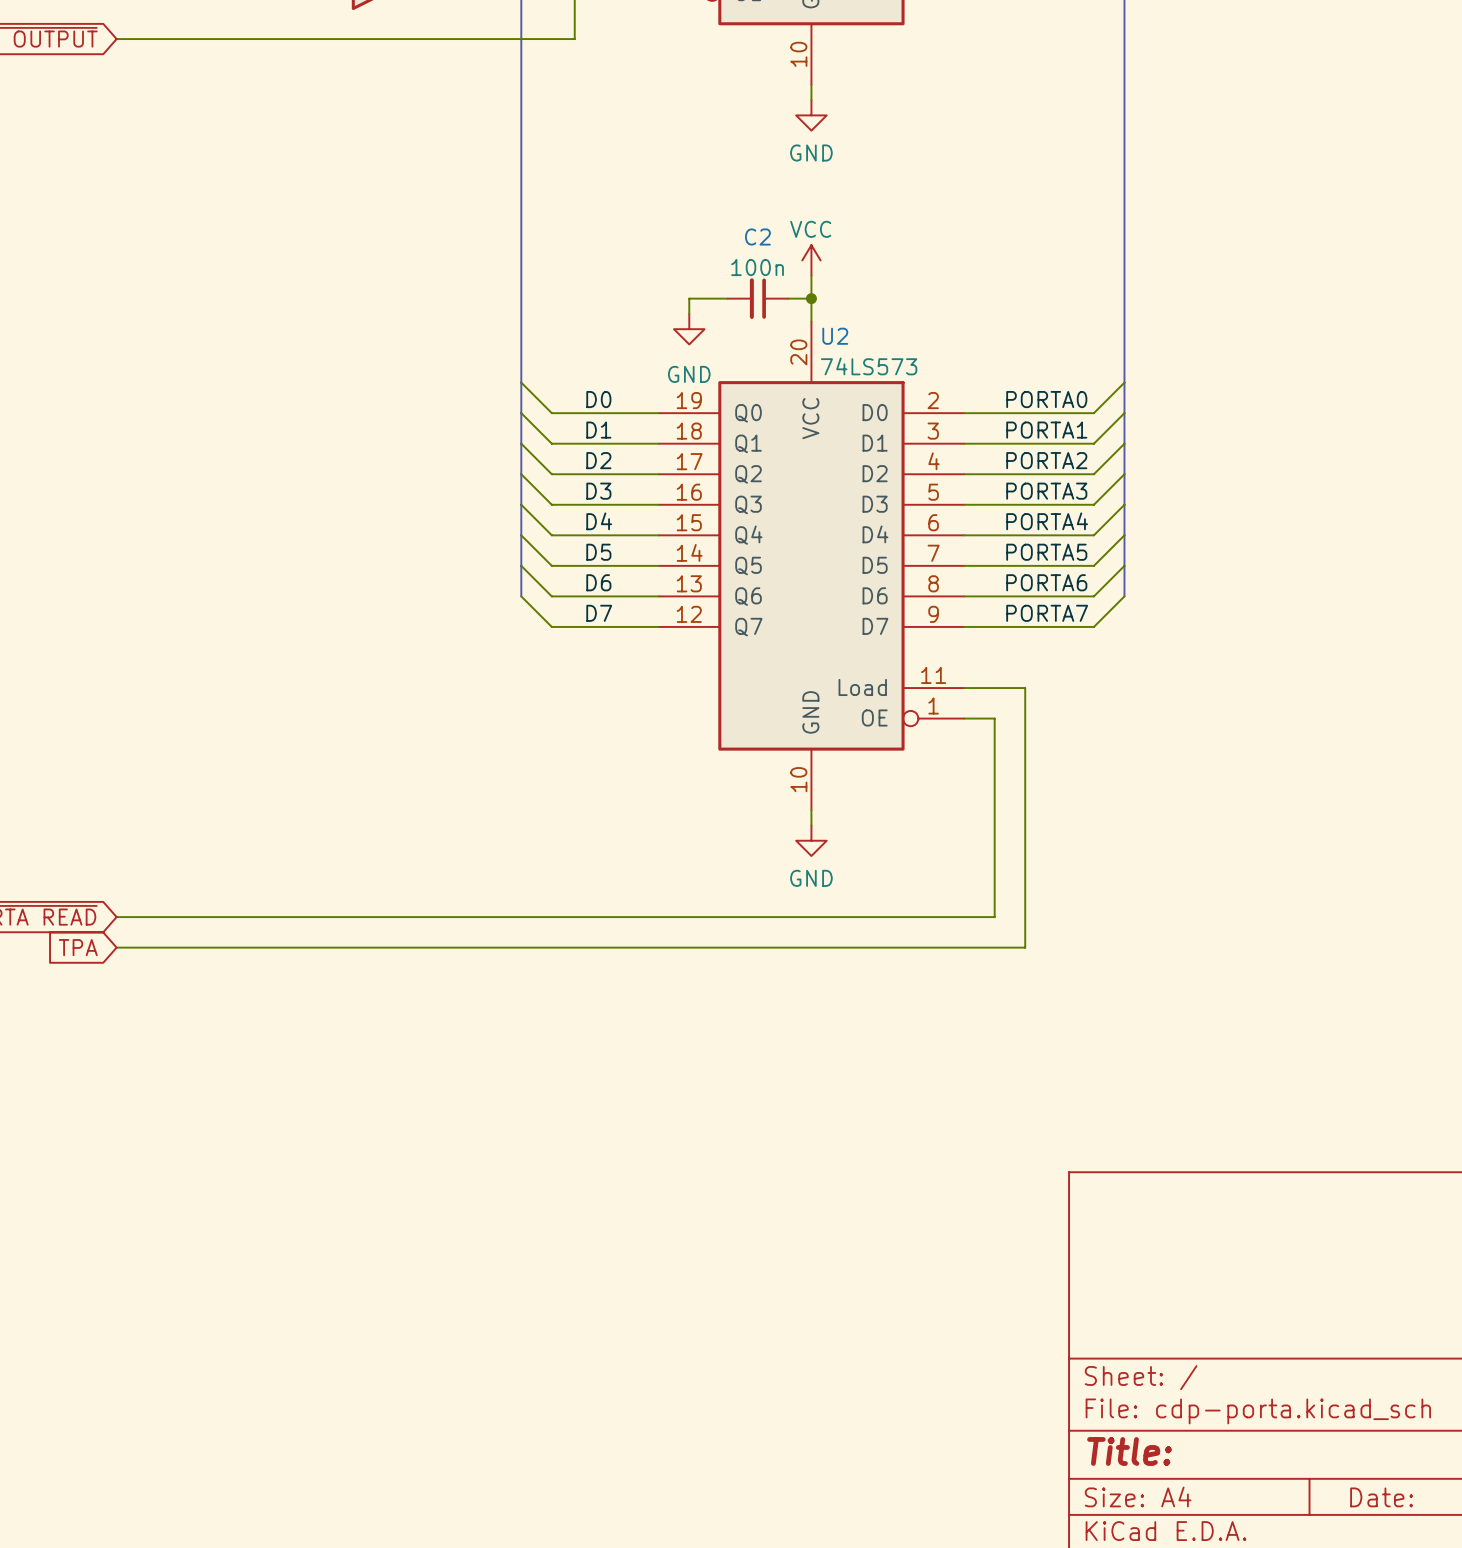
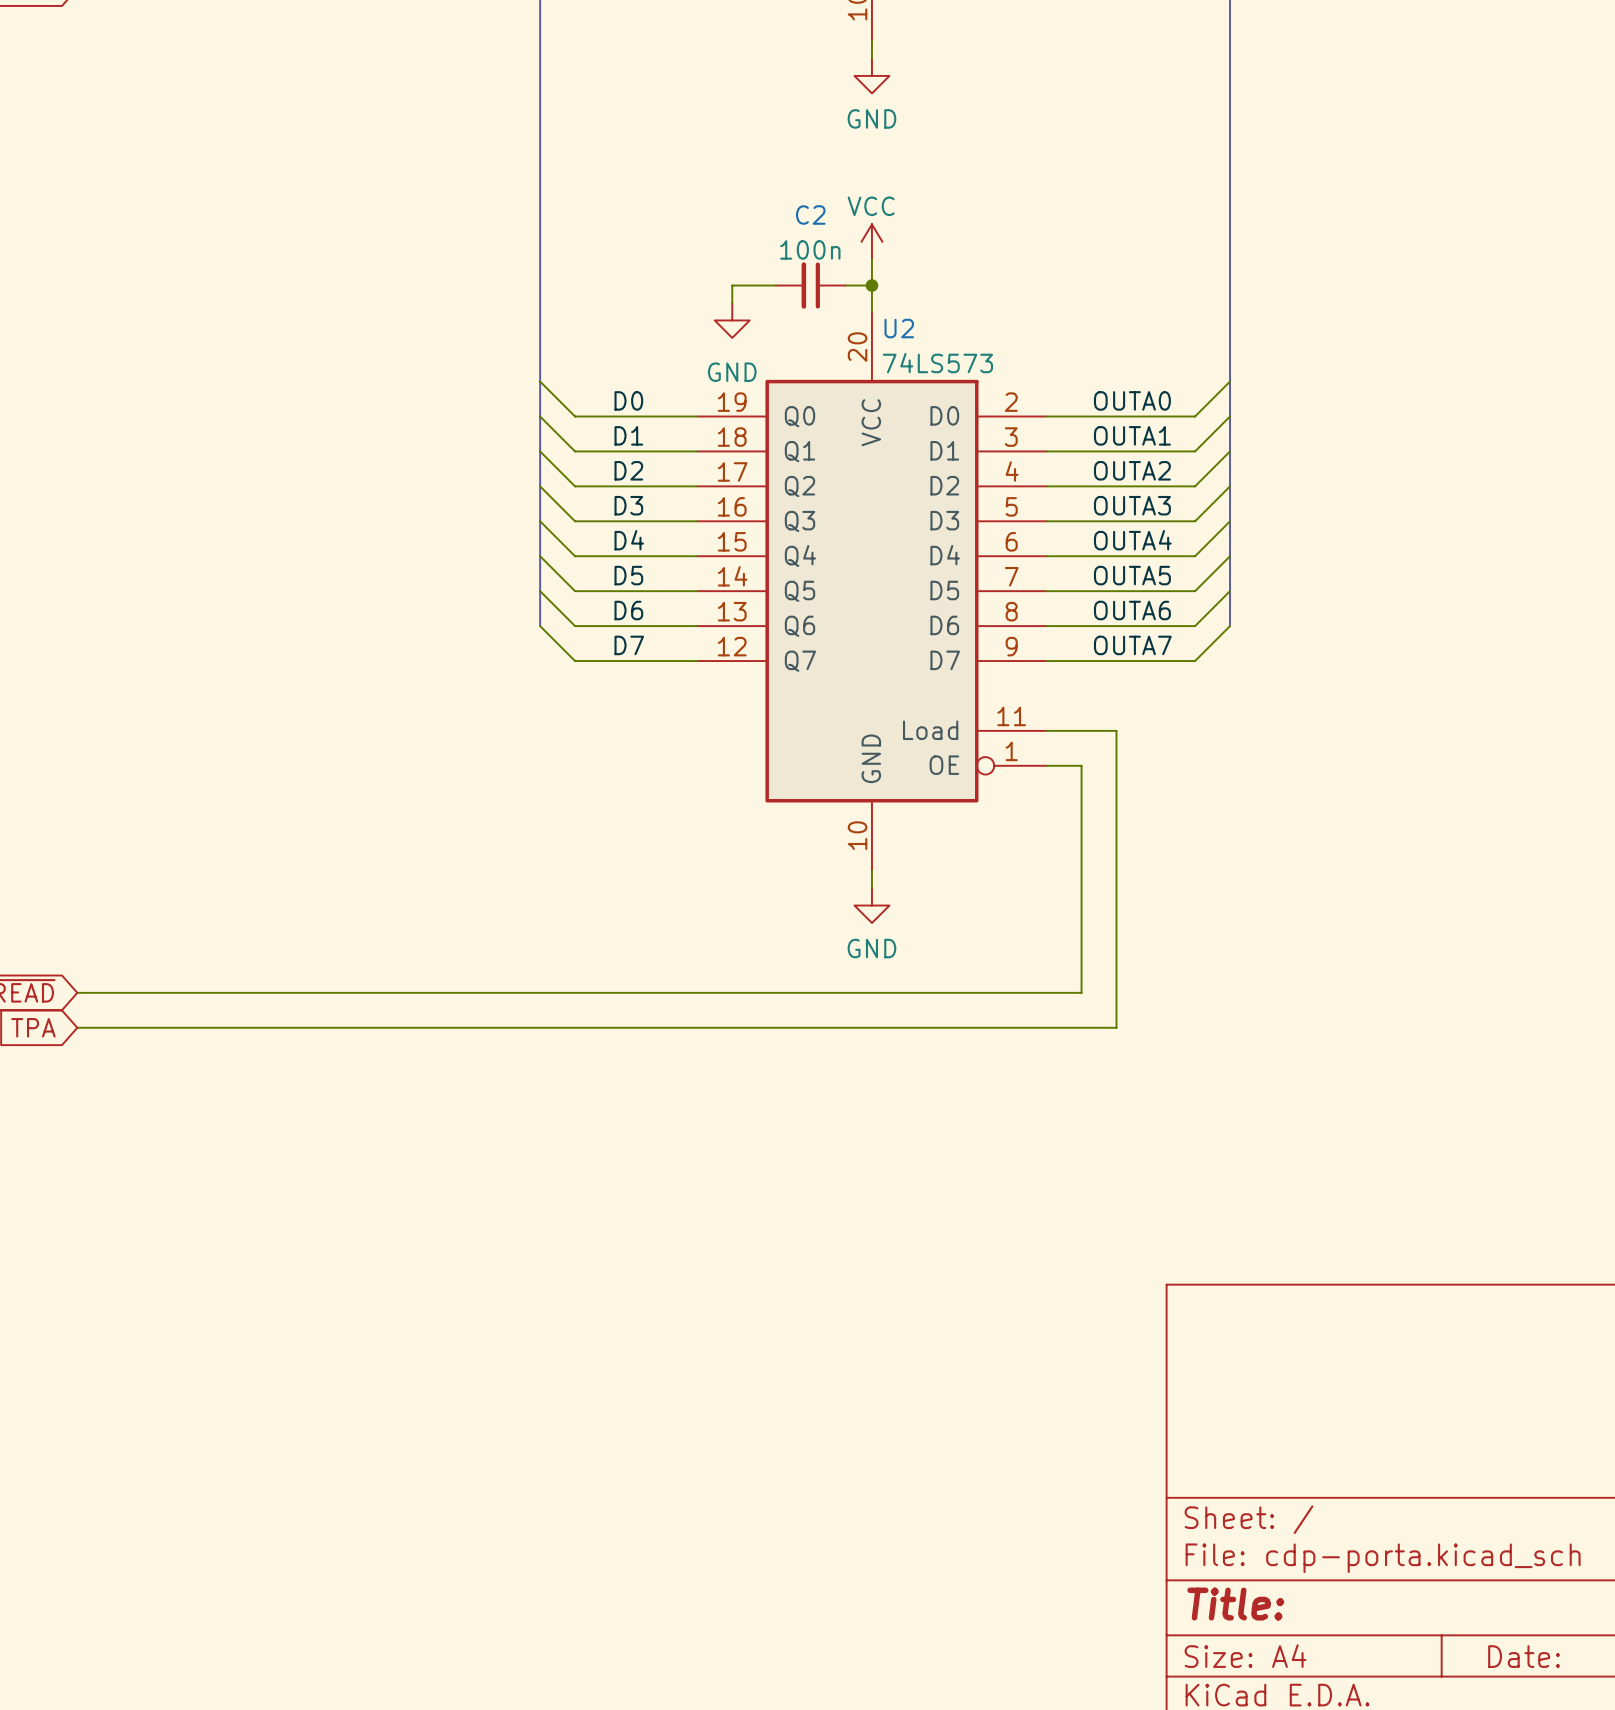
label: PORTA0 (1046, 399) -> OUTA0 (1132, 400)
label: PORTA1 (1046, 430) -> OUTA1 (1132, 435)
label: PORTA2 (1046, 460) -> OUTA2 (1132, 470)
label: PORTA3 (1046, 491) -> OUTA3 (1132, 505)
label: PORTA4 (1047, 521) -> OUTA4 (1132, 540)
label: PORTA5 (1046, 552) -> OUTA5 (1132, 575)
label: PORTA6 (1046, 582) -> OUTA6 (1132, 610)
label: PORTA7 (1047, 613) -> OUTA7 (1132, 645)

